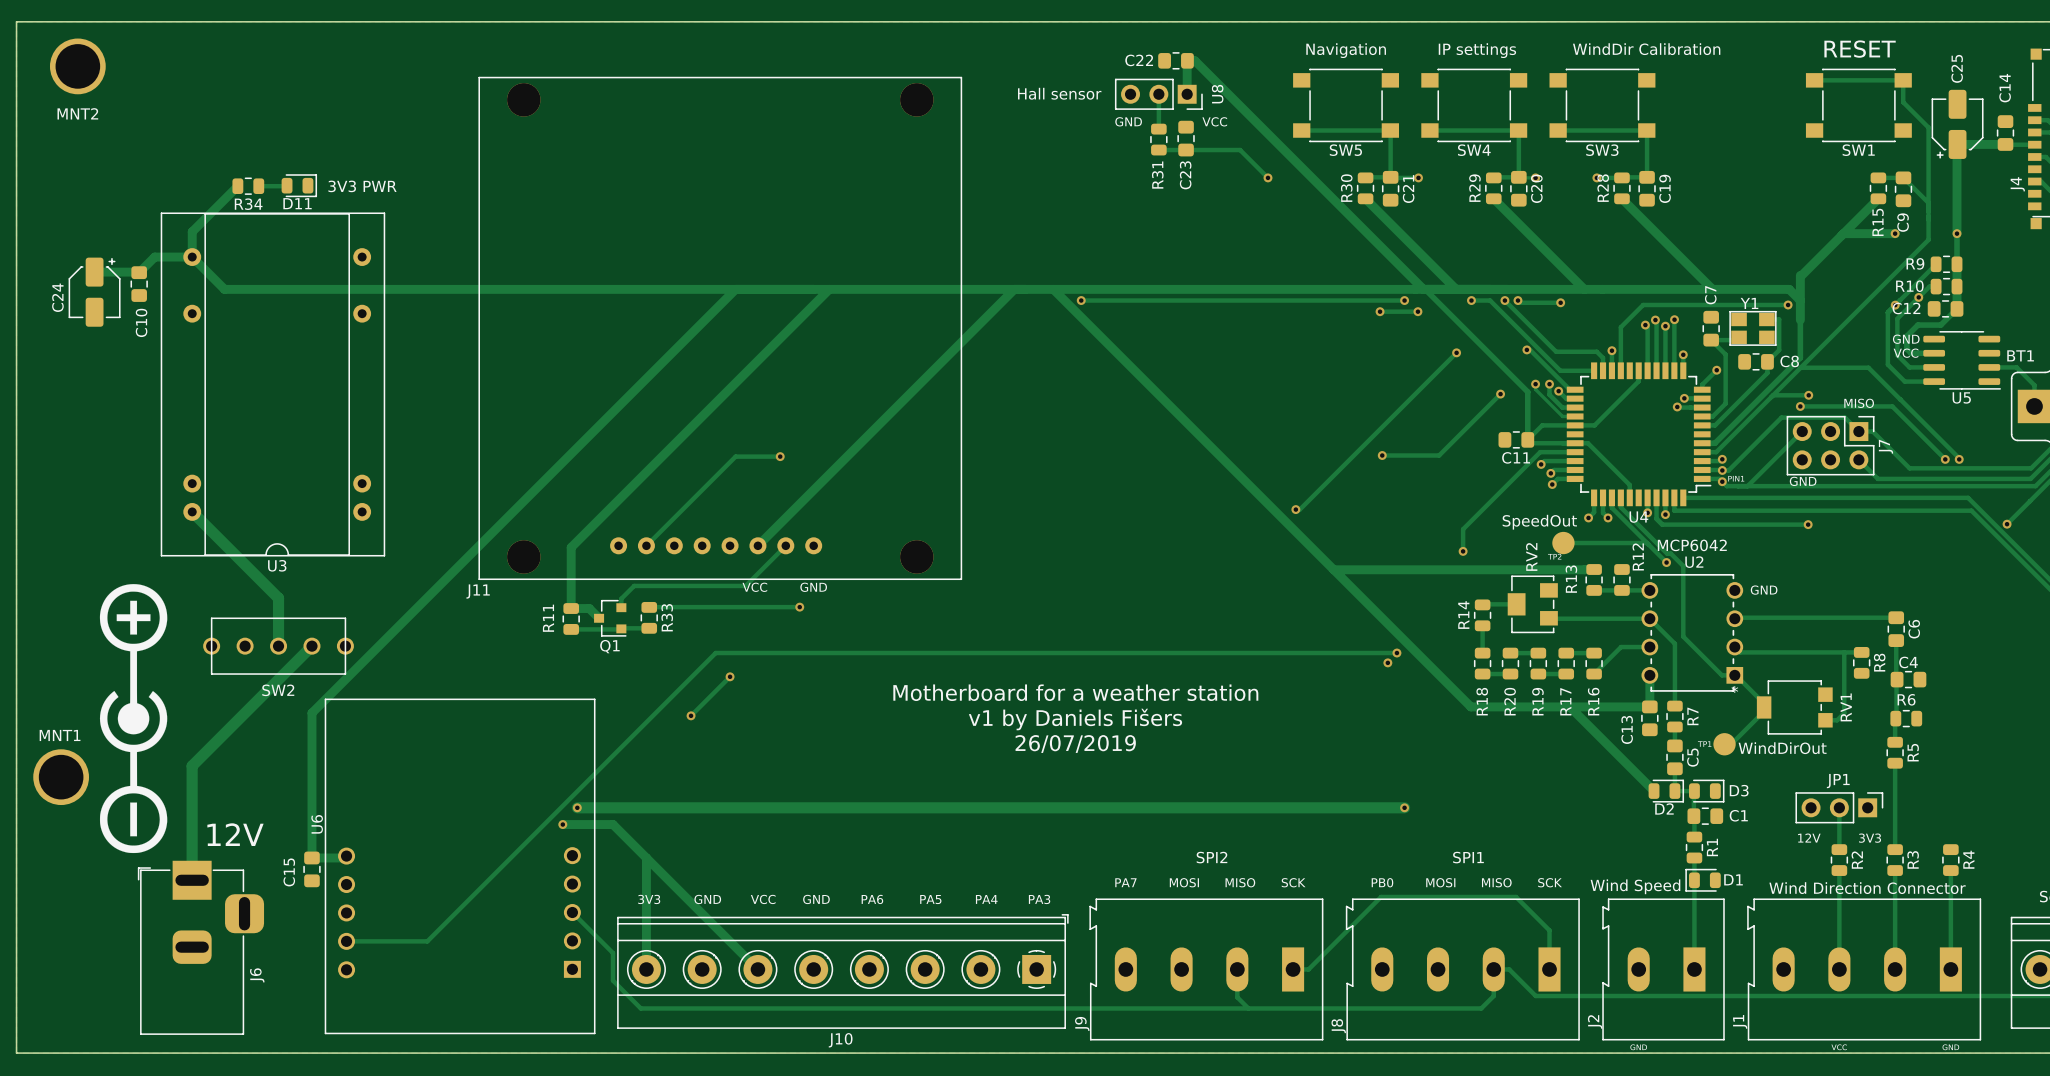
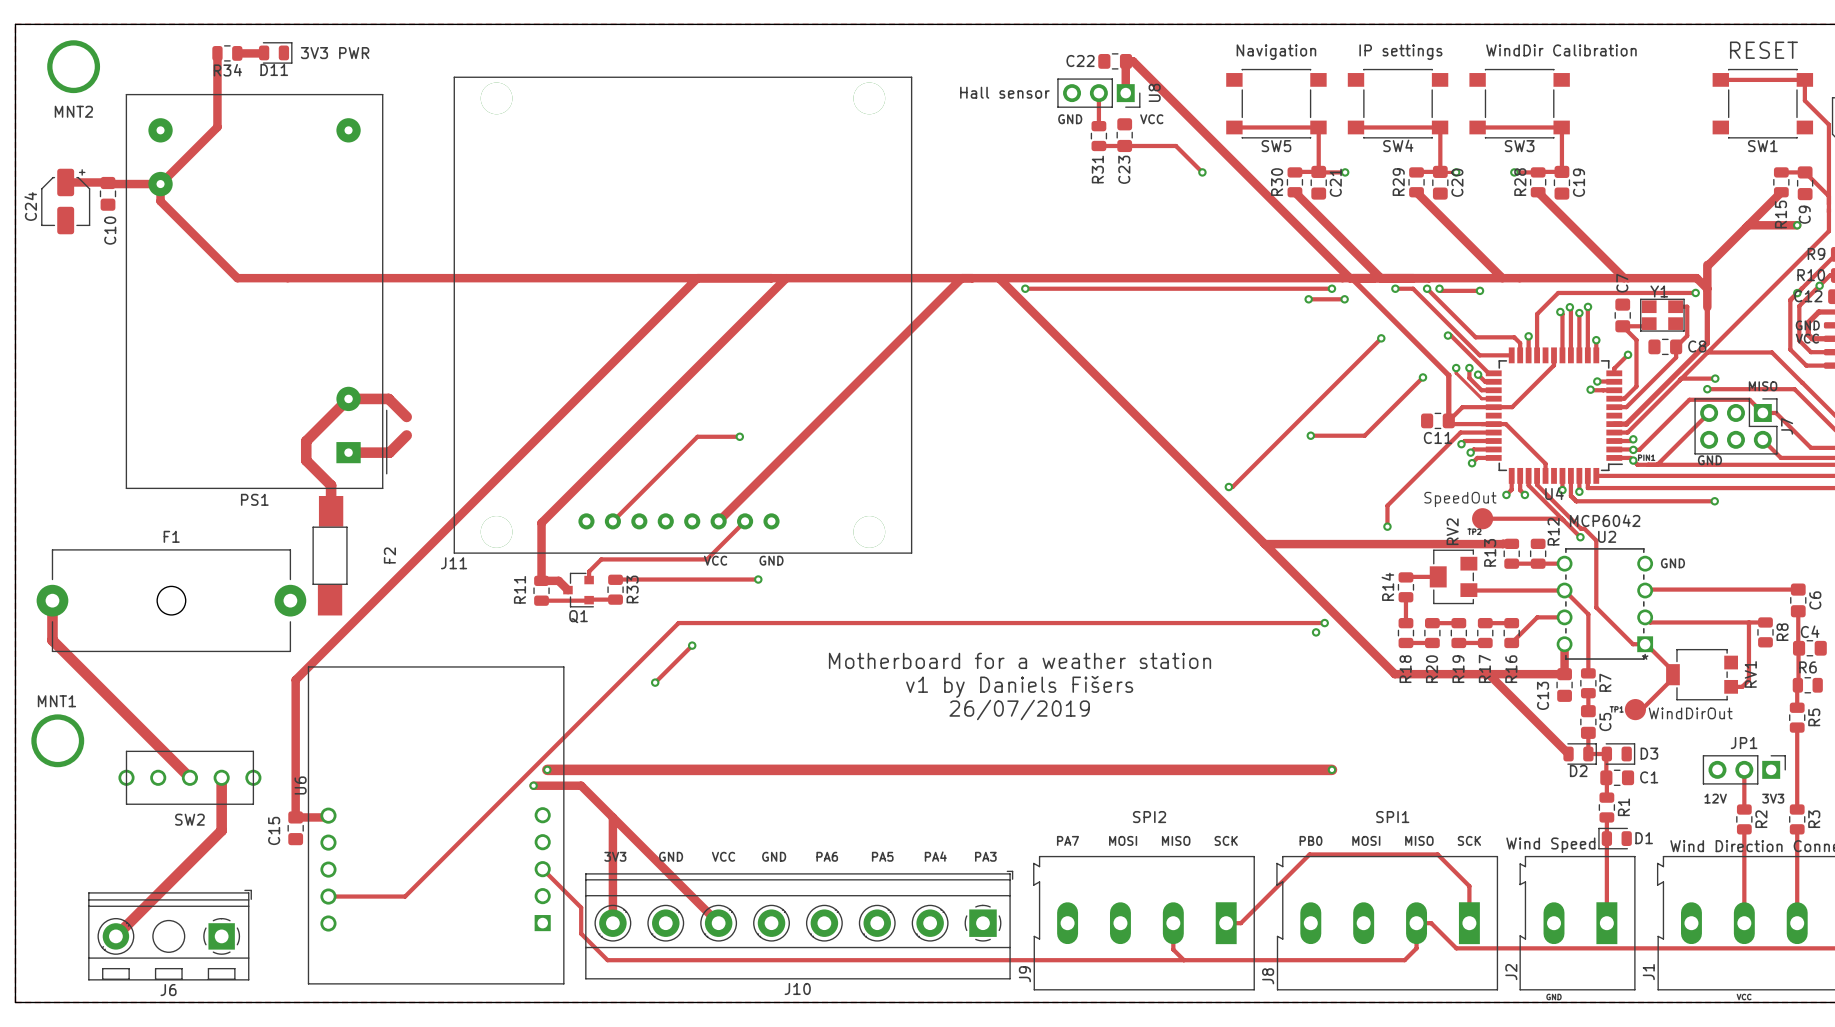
track: none -> (217, 53) (217, 127) (160, 184)
track: (287, 185) (258, 186) -> (264, 52) (237, 53)
D11 position: (299, 185) -> (275, 52)
track: (237, 186) (192, 231) (192, 257) -> none
R34 position: (248, 186) -> (227, 53)
text position: 3V3 PWR (362, 186) -> 3V3 PWR (335, 53)
track: none -> (65, 182) (107, 182)
track: none -> (107, 183) (160, 184)
track: (192, 257) (224, 289) (250, 289) -> (160, 184) (160, 201) (237, 278)
track: (192, 257) (154, 257) (139, 272) (94, 272) -> none
C10 position: (139, 284) -> (107, 193)
C24 position: (94, 292) -> (65, 201)
PS1: none -> (256, 291)
U3: (272, 384) -> none
track: none -> (406, 416) (388, 398) (348, 398) (306, 441) (306, 460) (331, 485) (331, 511)
track: none -> (406, 435) (389, 452) (348, 452)
track: (192, 511) (278, 598) (278, 646) -> none
F2: none -> (330, 555)
drawing: [99, 584, 168, 854] -> none
track: none -> (52, 600) (52, 640) (189, 777)
F1: none -> (171, 600)
SW2 position: (278, 646) -> (189, 777)
track: (311, 646) (192, 766) (192, 880) -> none
track: none -> (221, 777) (221, 830) (115, 936)
text: 12V (235, 834) -> none
J6 footprint: [137, 860, 265, 1035] -> [88, 889, 252, 981]
J6 name position: J6 (257, 975) -> J6 (168, 990)

